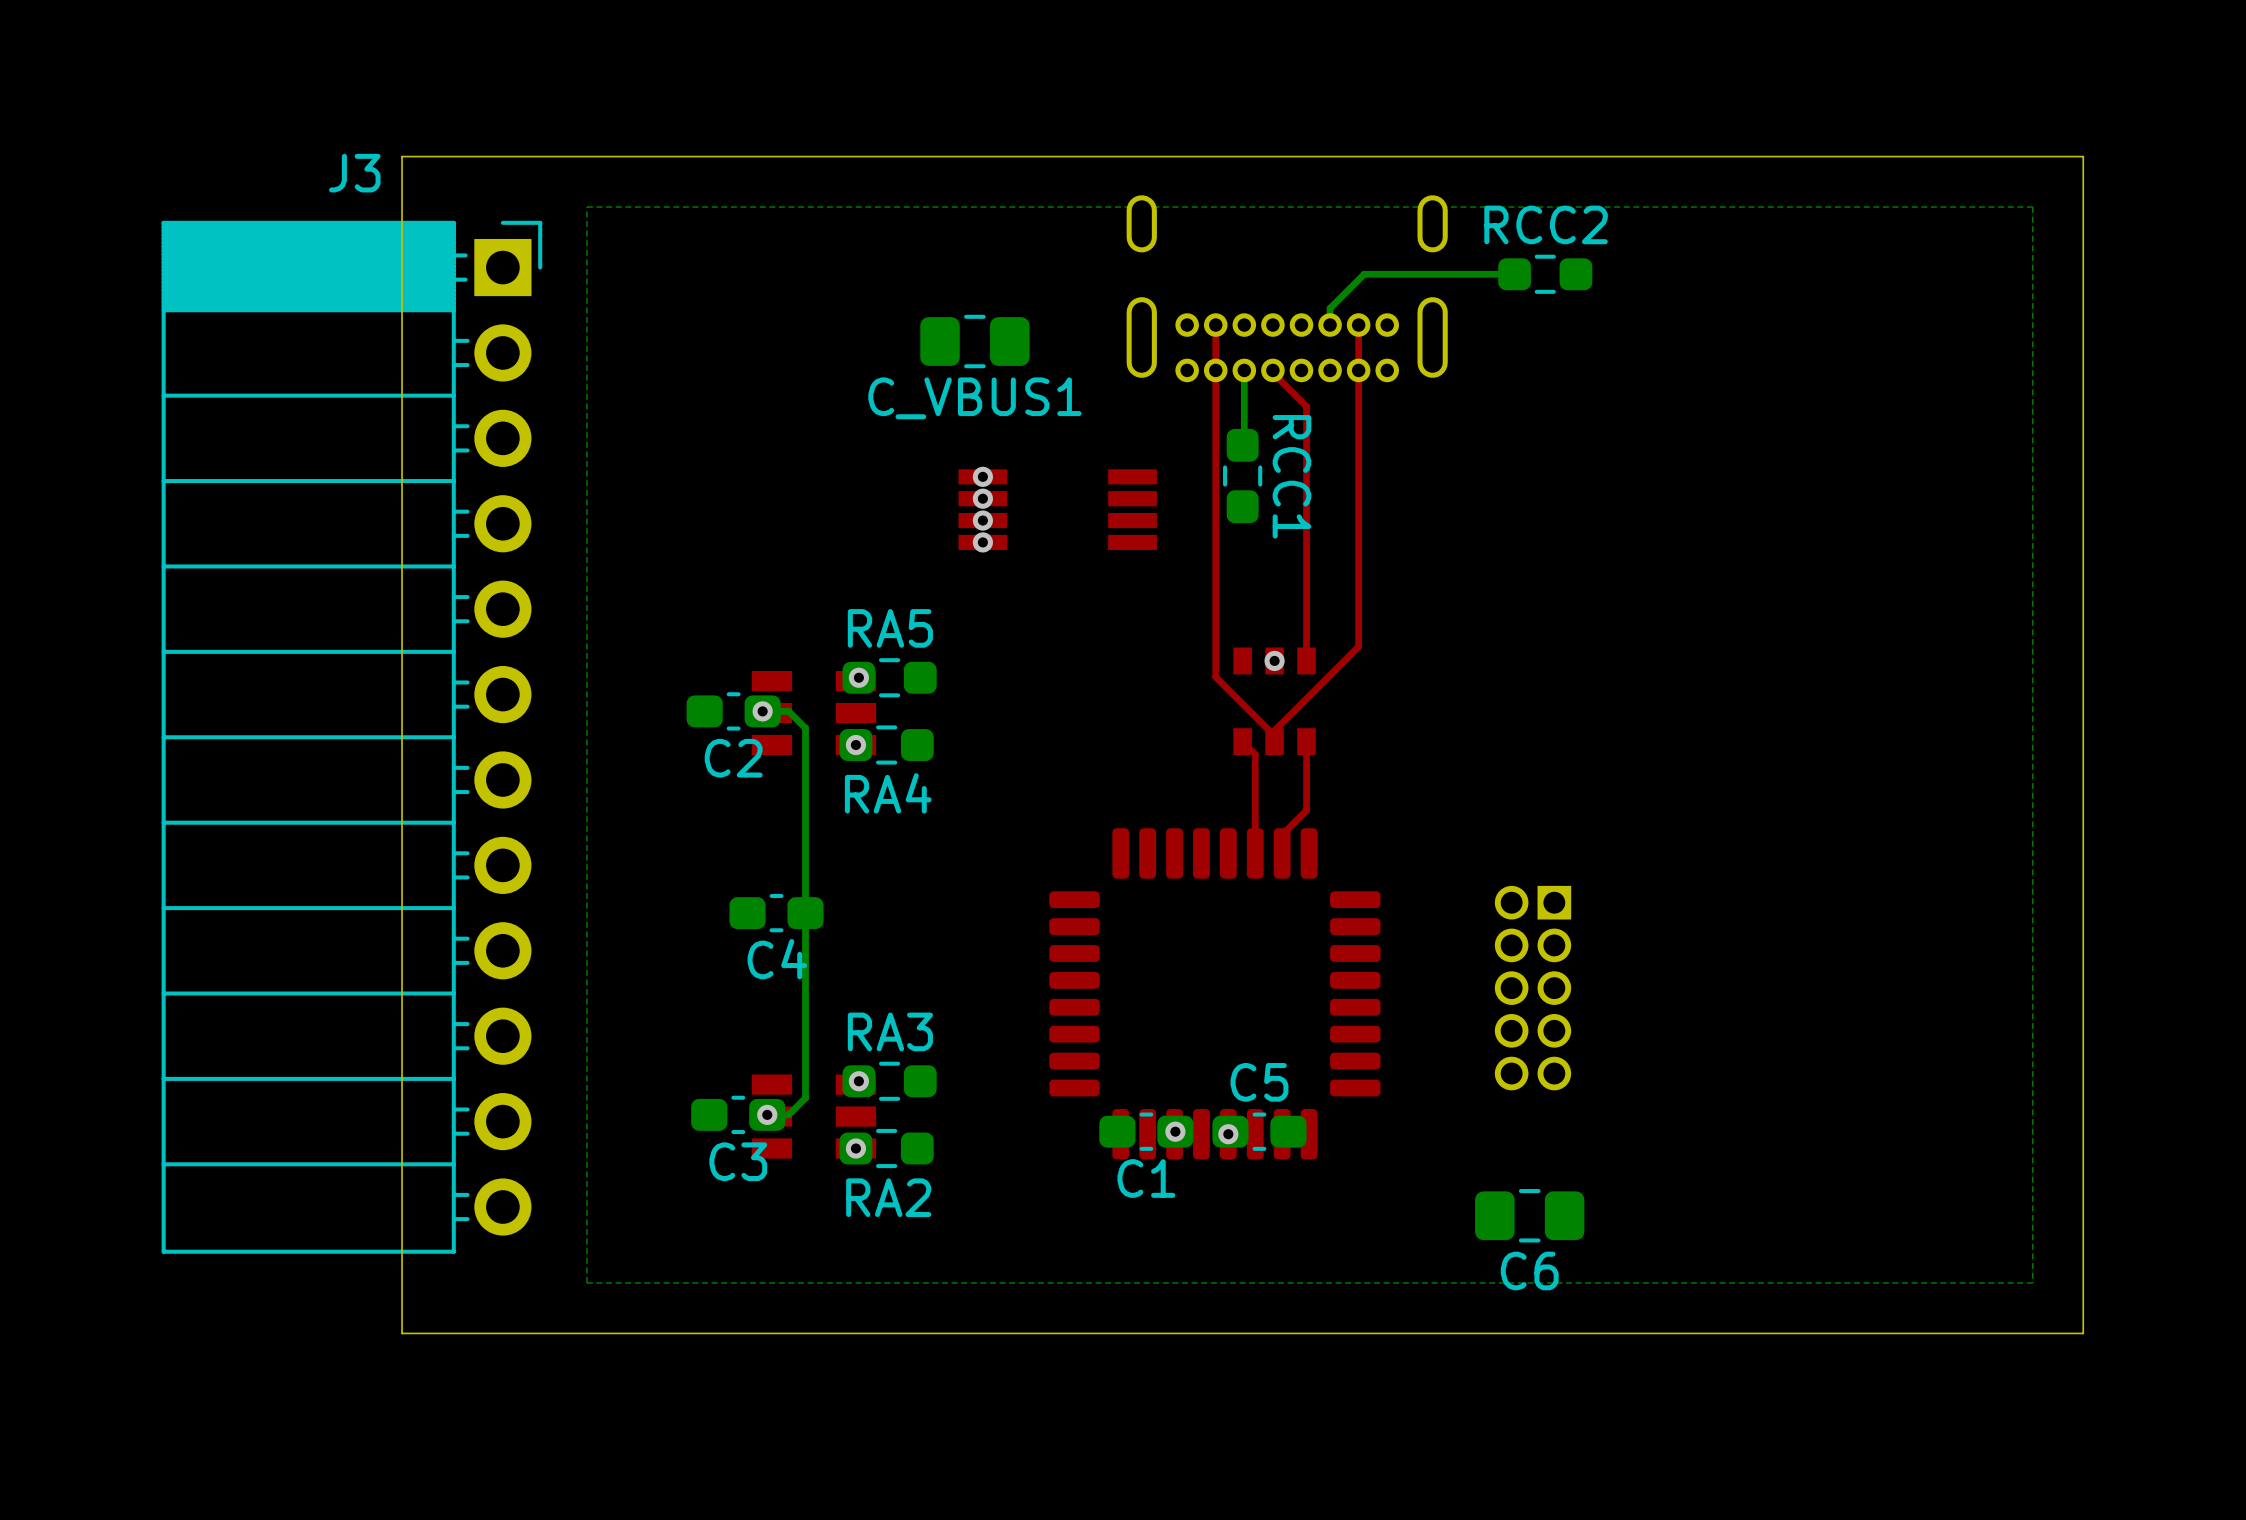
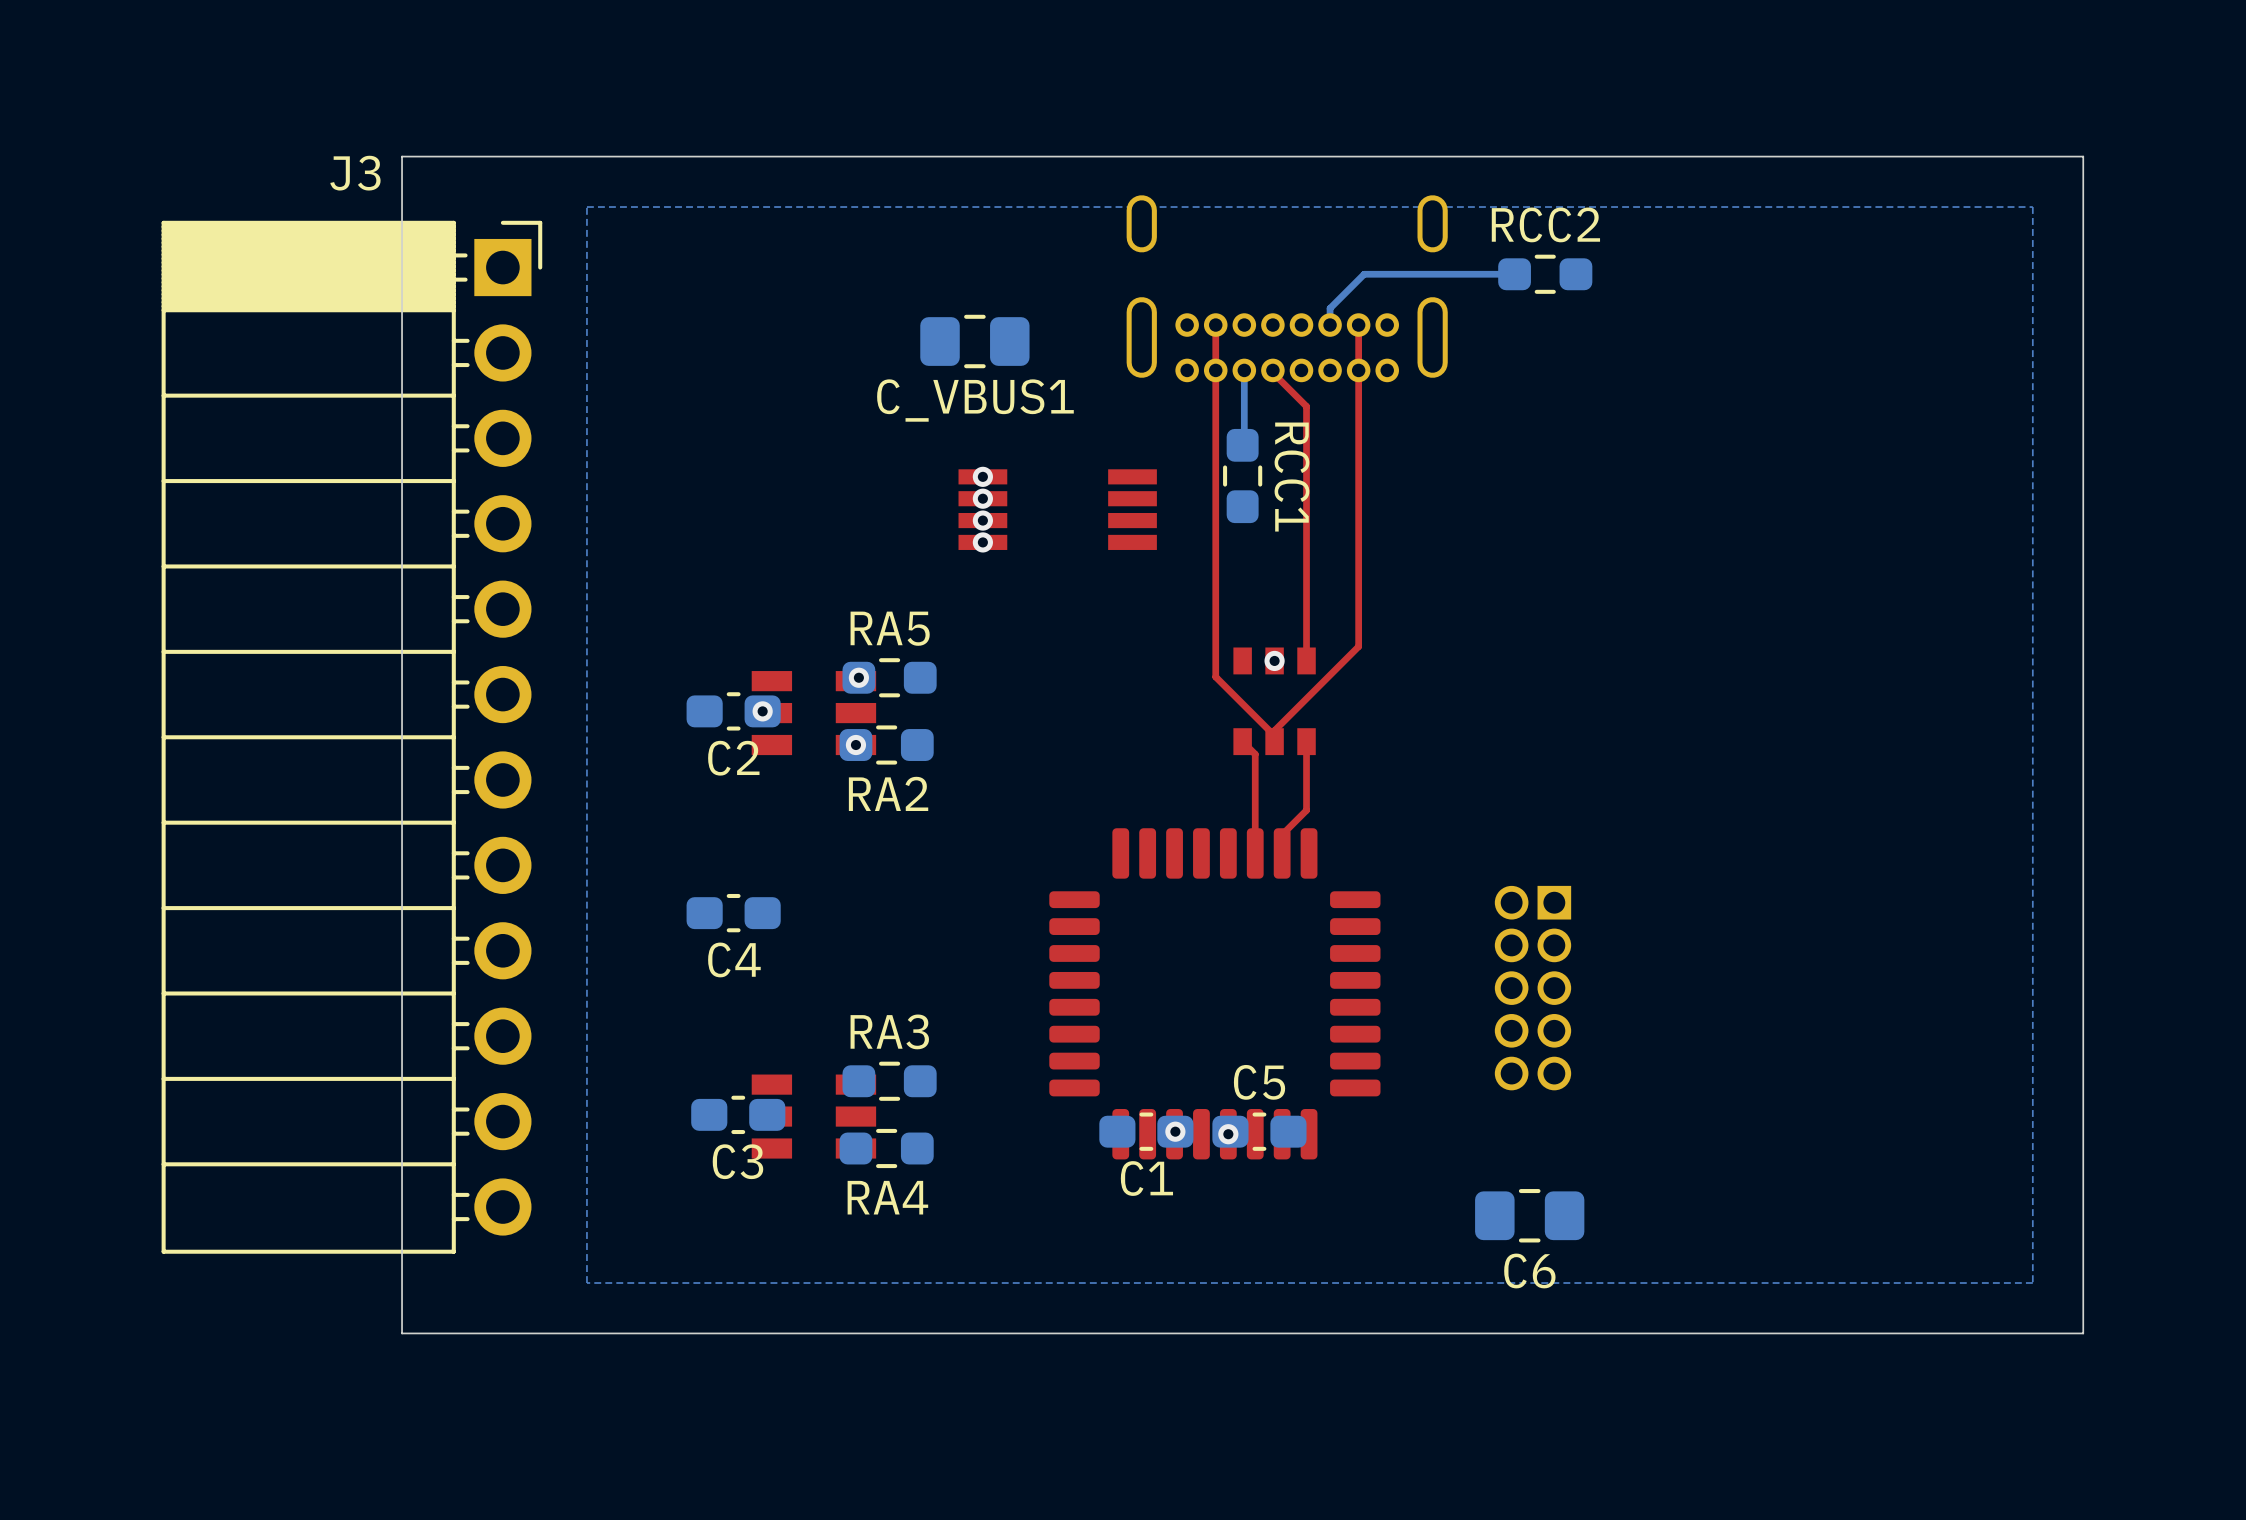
bottom track: (762, 711) (788, 711) (805, 728) (805, 1098) (788, 1114) (767, 1114) -> none
RA4 name: RA4 (888, 793) -> RA2 (888, 793)
C4 position: (776, 913) -> (733, 913)
via: (858, 1081) -> none
via: (767, 1114) -> none
via: (855, 1148) -> none
RA2 name: RA2 (888, 1197) -> RA4 (887, 1197)

